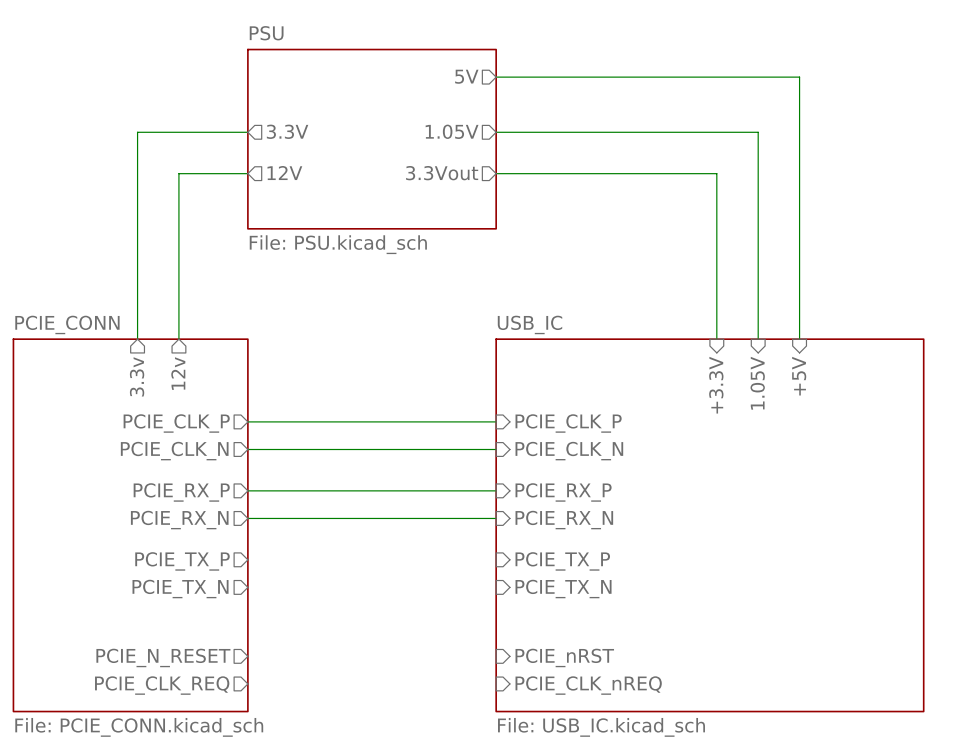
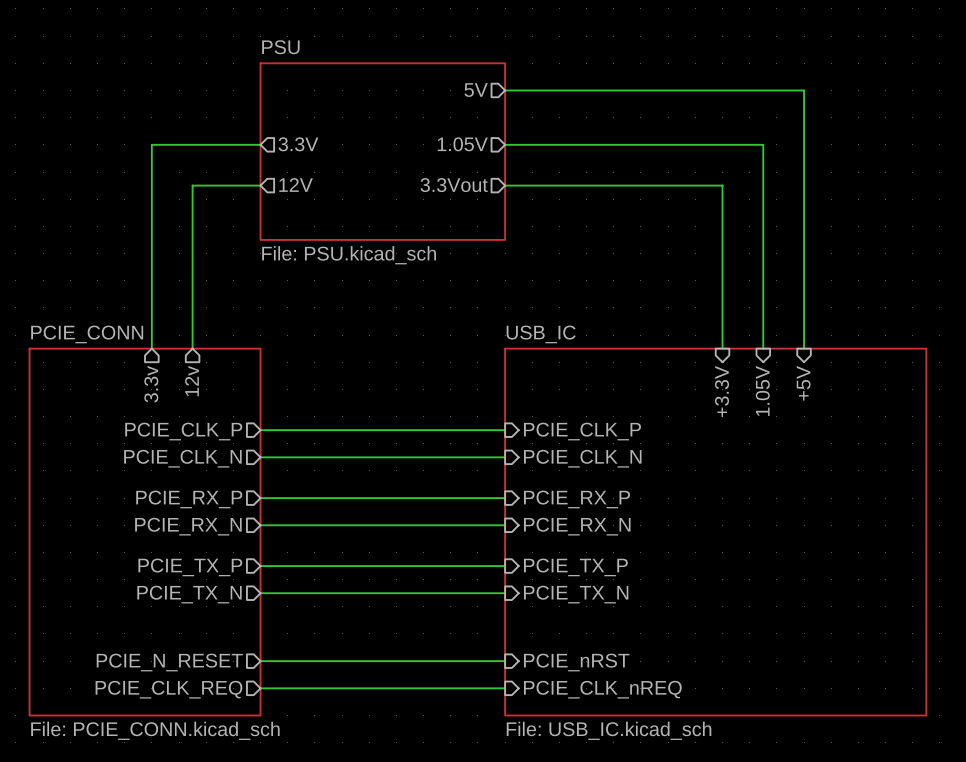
wire: none -> (260, 566) (505, 566)
wire: none -> (260, 593) (505, 593)
wire: none -> (260, 661) (505, 661)
wire: none -> (260, 688) (505, 688)

